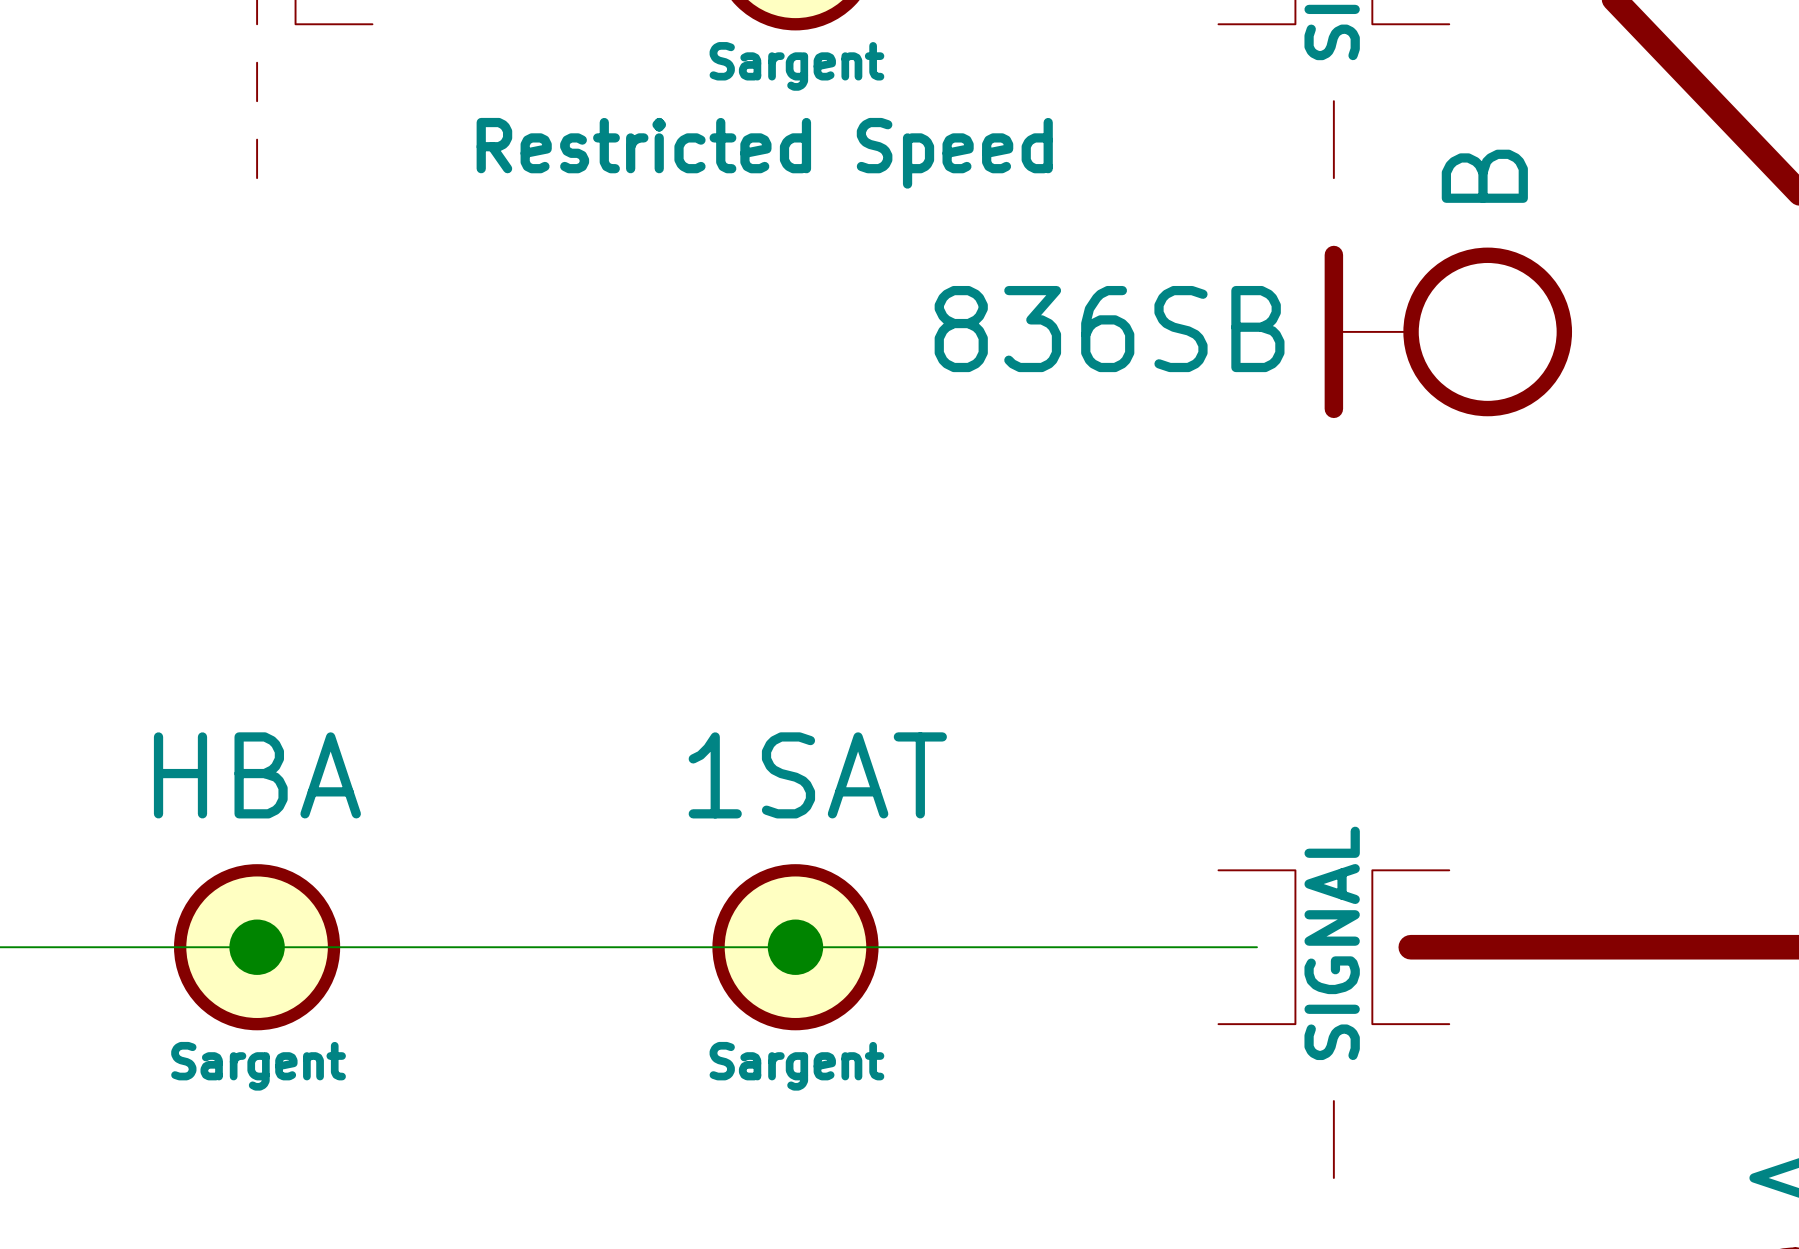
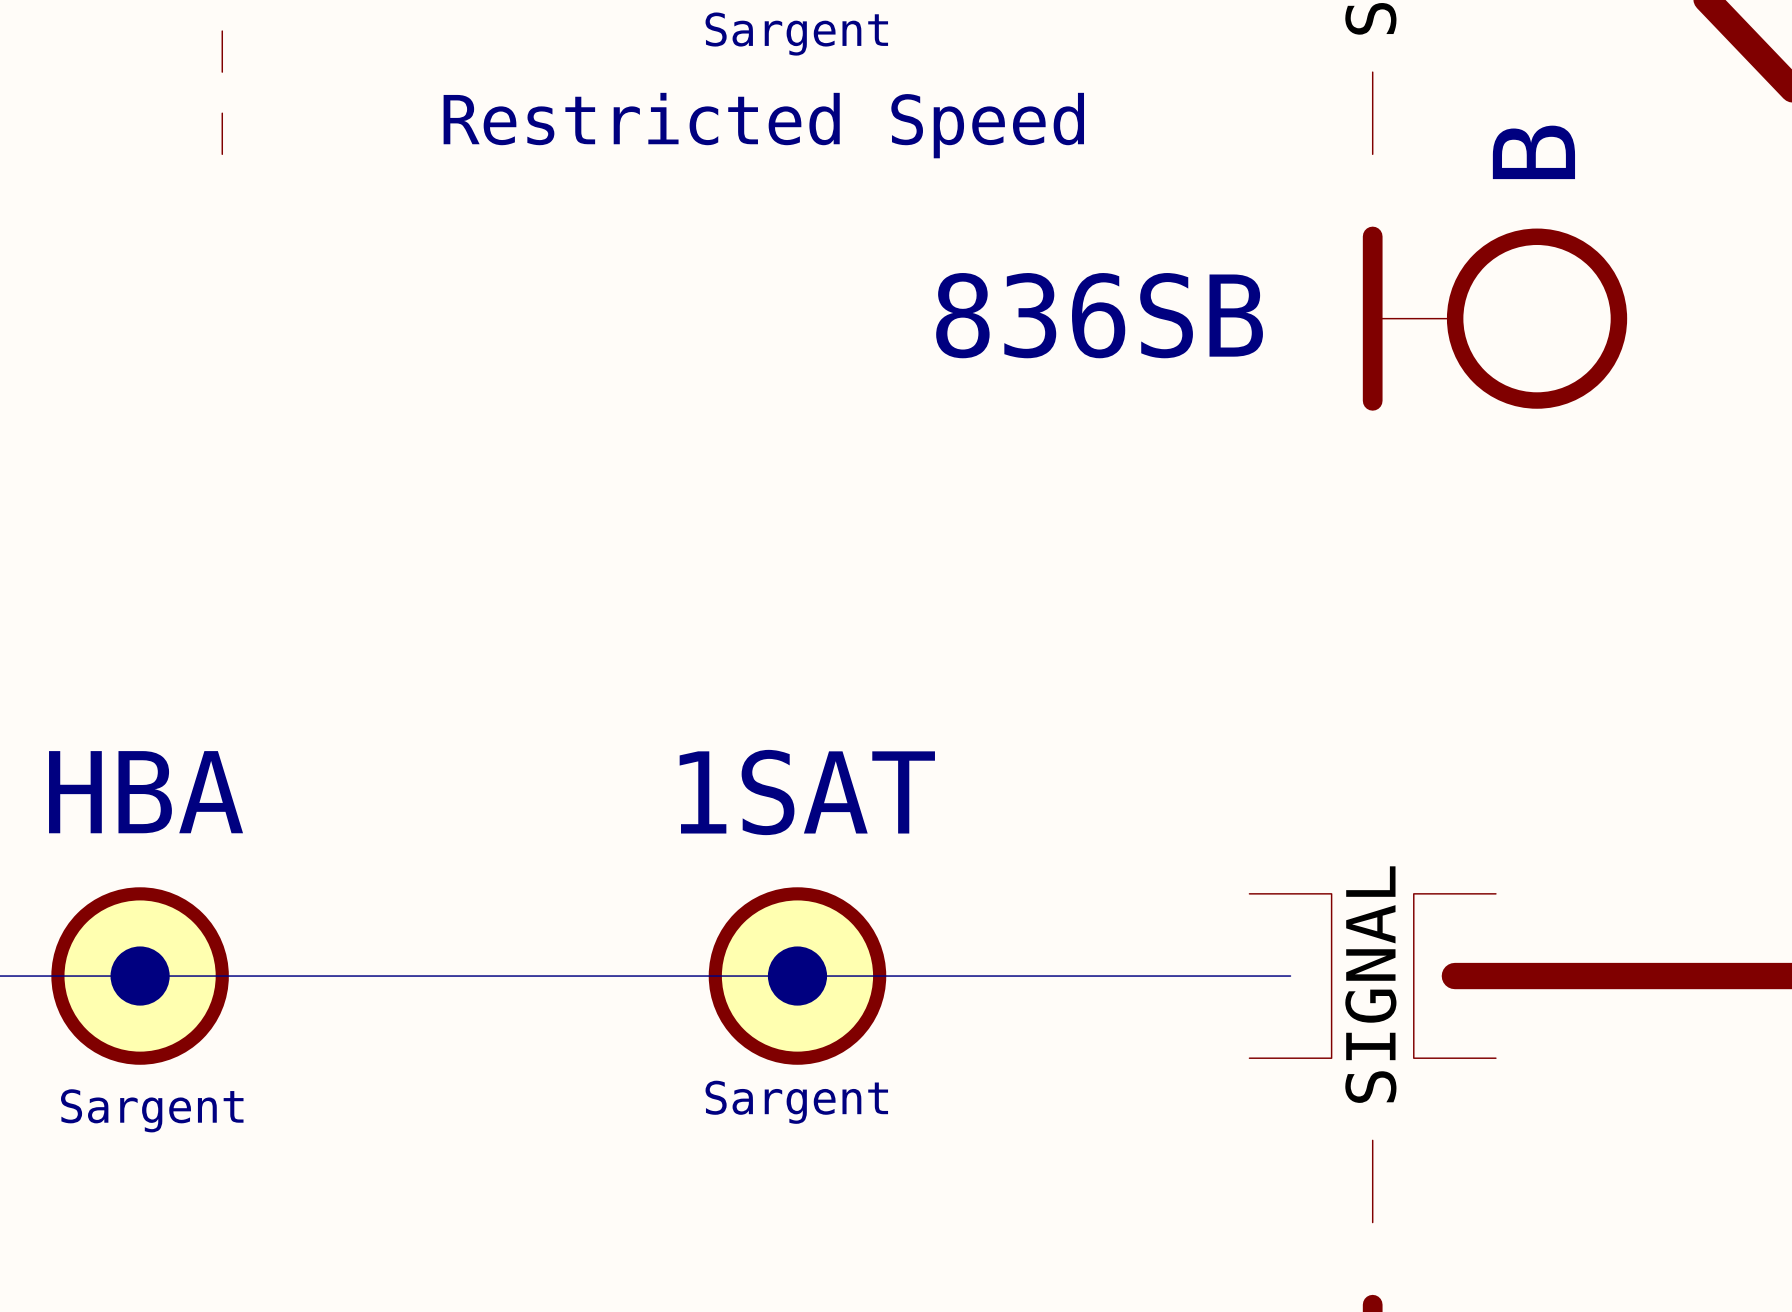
part value position: HBA (257, 775) -> HBA (146, 792)
junction position: (257, 947) -> (140, 976)
part position: (257, 947) -> (140, 976)
part text position: Sargent (258, 1066) -> Sargent (152, 1110)

